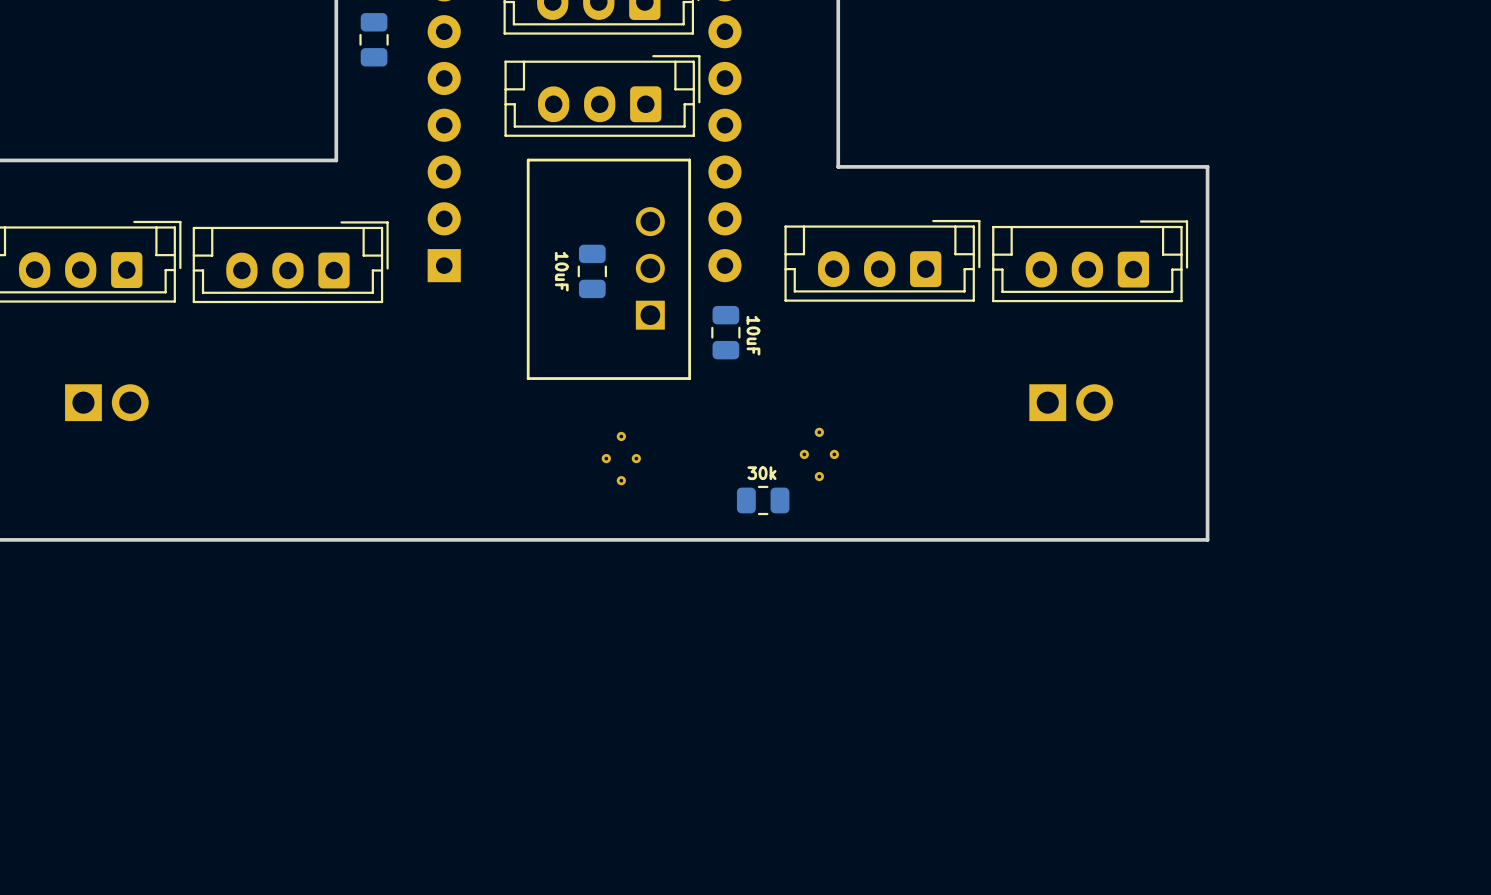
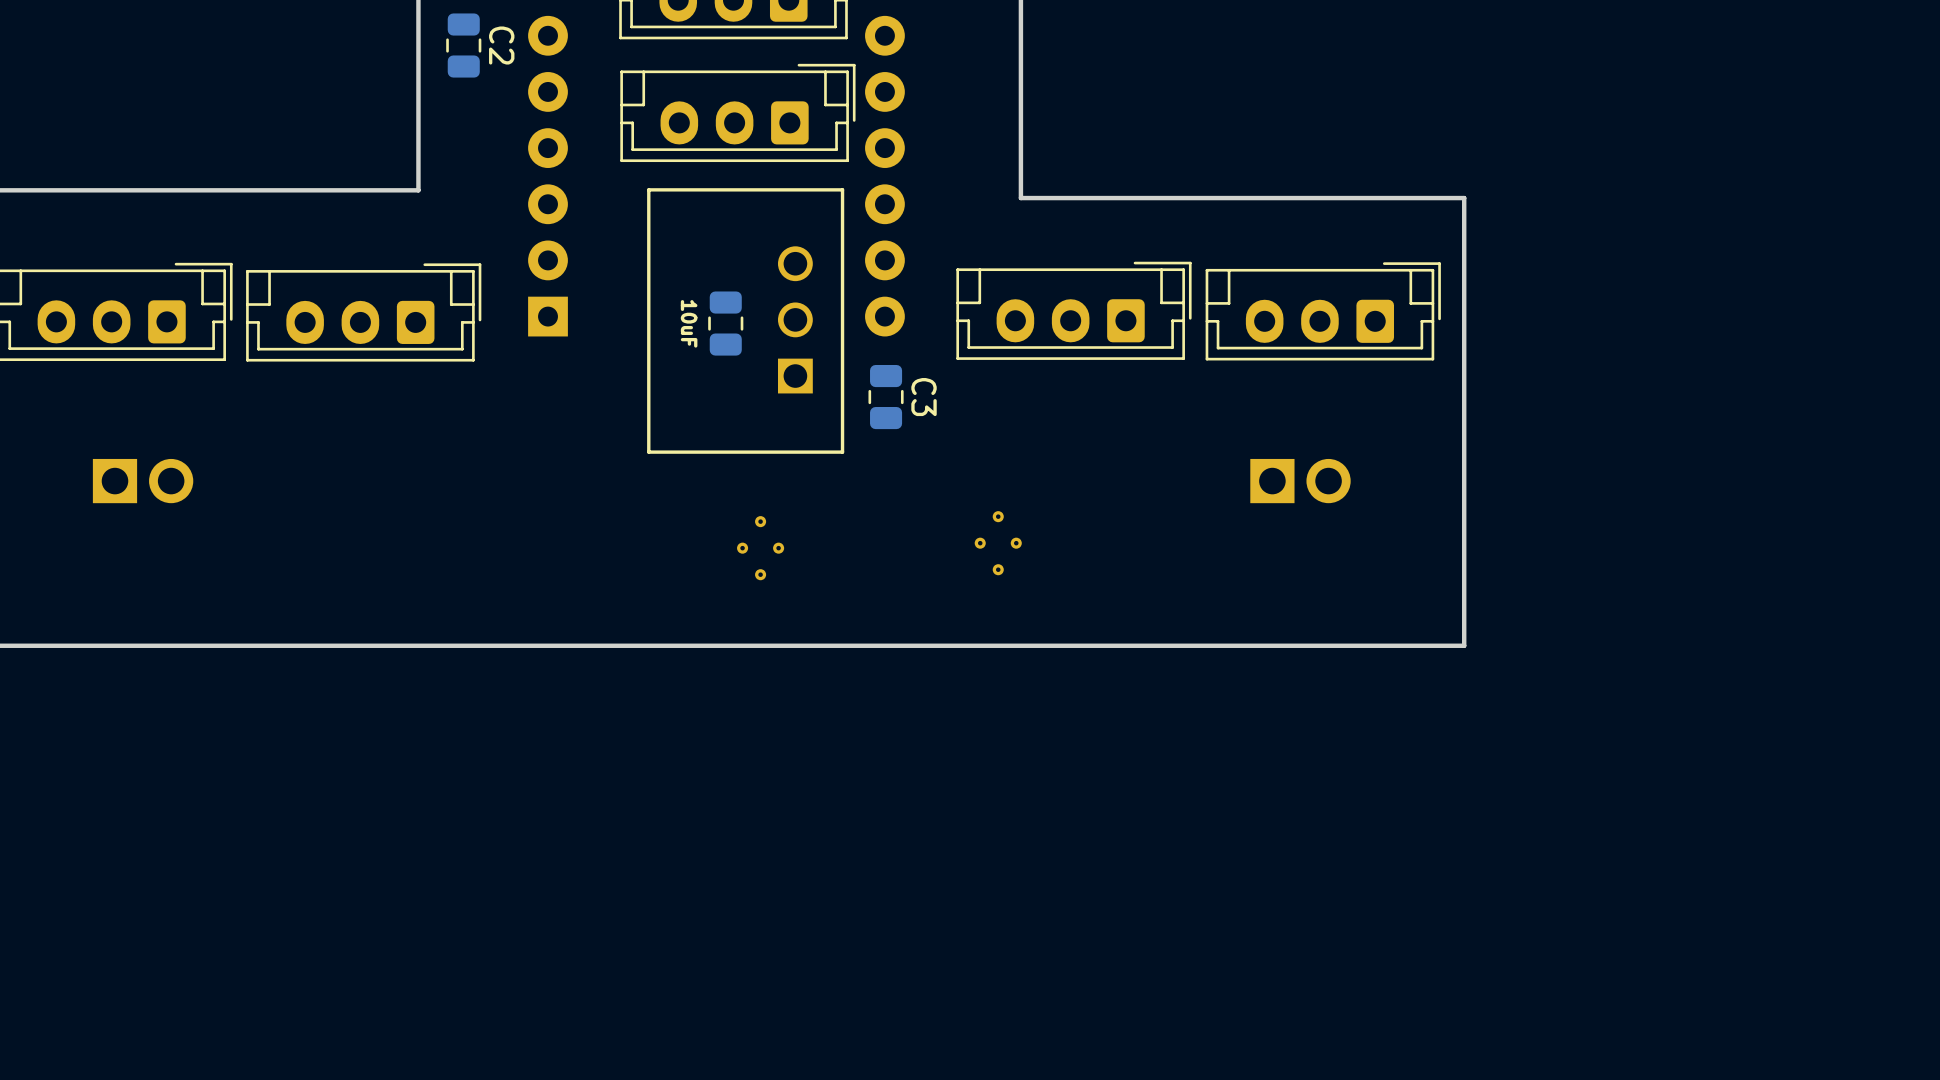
C2 name: none -> C2 (501, 45)
C3 name: none -> C3 (924, 397)
text: 10uF (753, 335) -> none
text: 30k (761, 473) -> none
part: (763, 500) -> none

